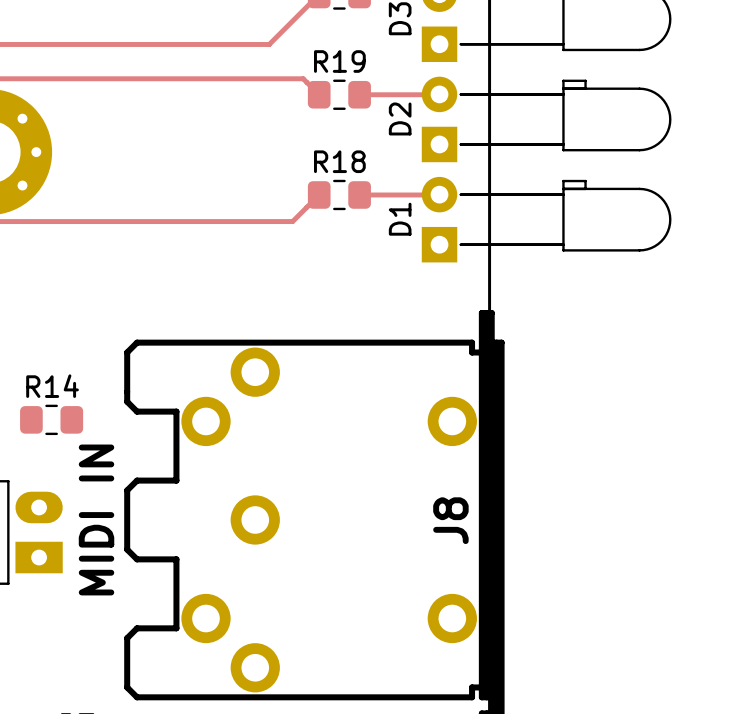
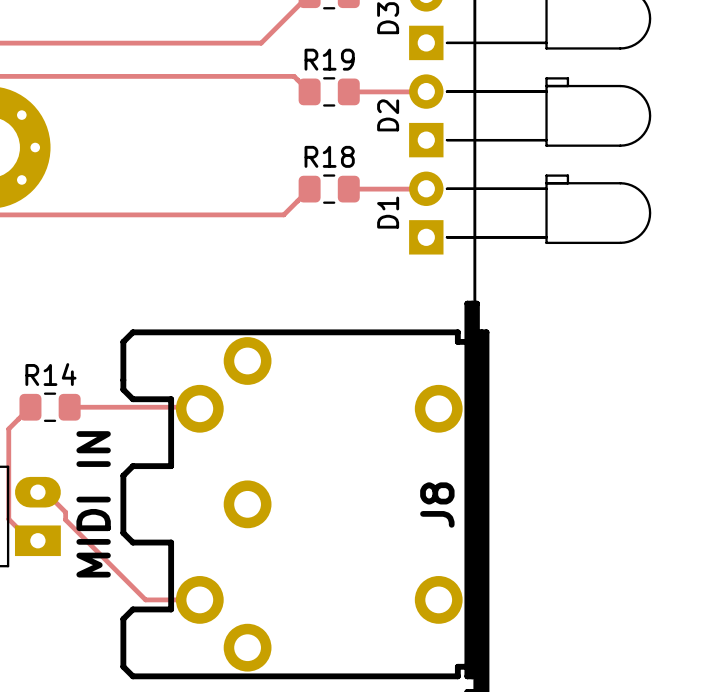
top track: none -> (30, 407) (8, 428) (8, 519) (30, 540) (37, 540)
top track: none -> (69, 407) (198, 407) (199, 408)
top track: none -> (37, 492) (45, 492) (65, 512) (65, 519) (145, 599) (199, 599)

